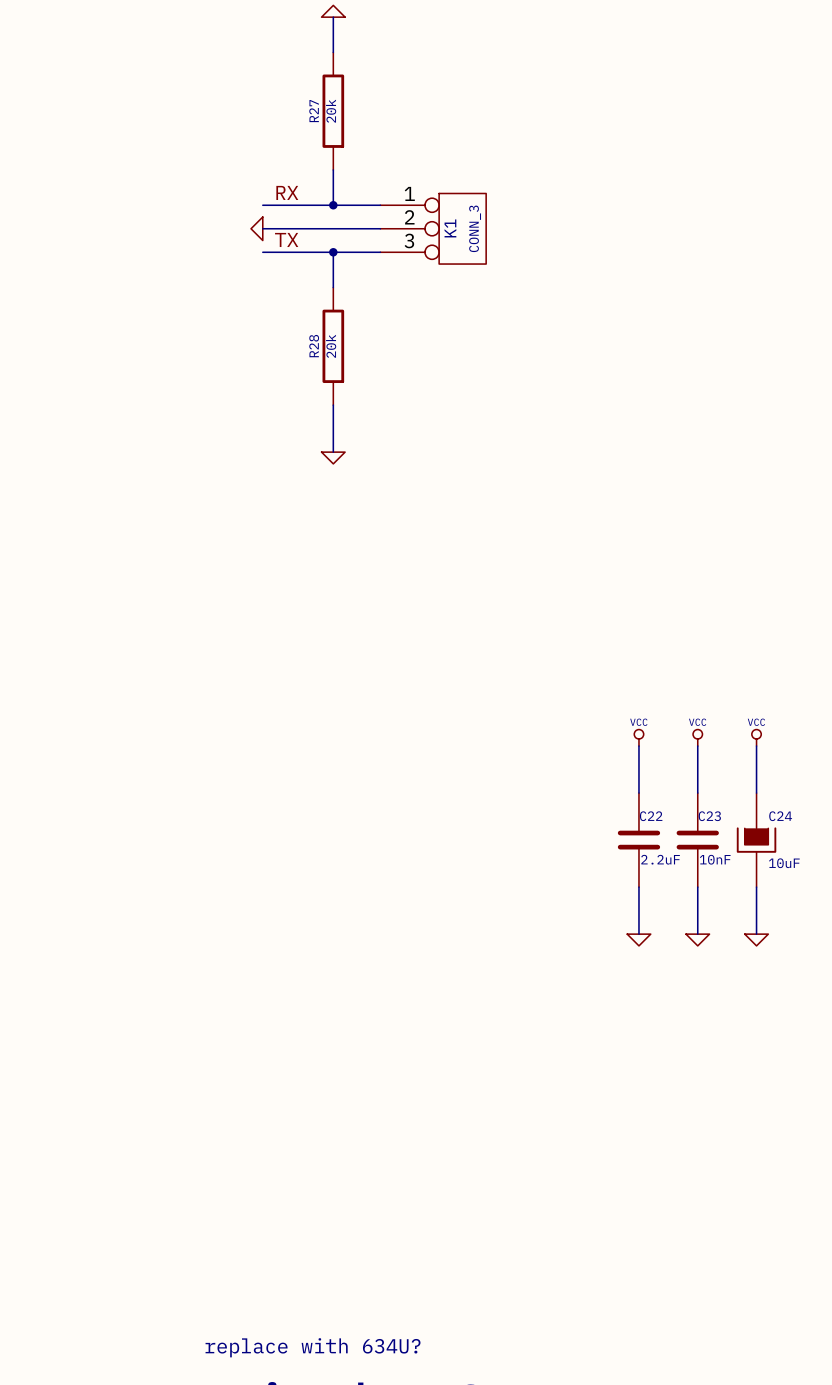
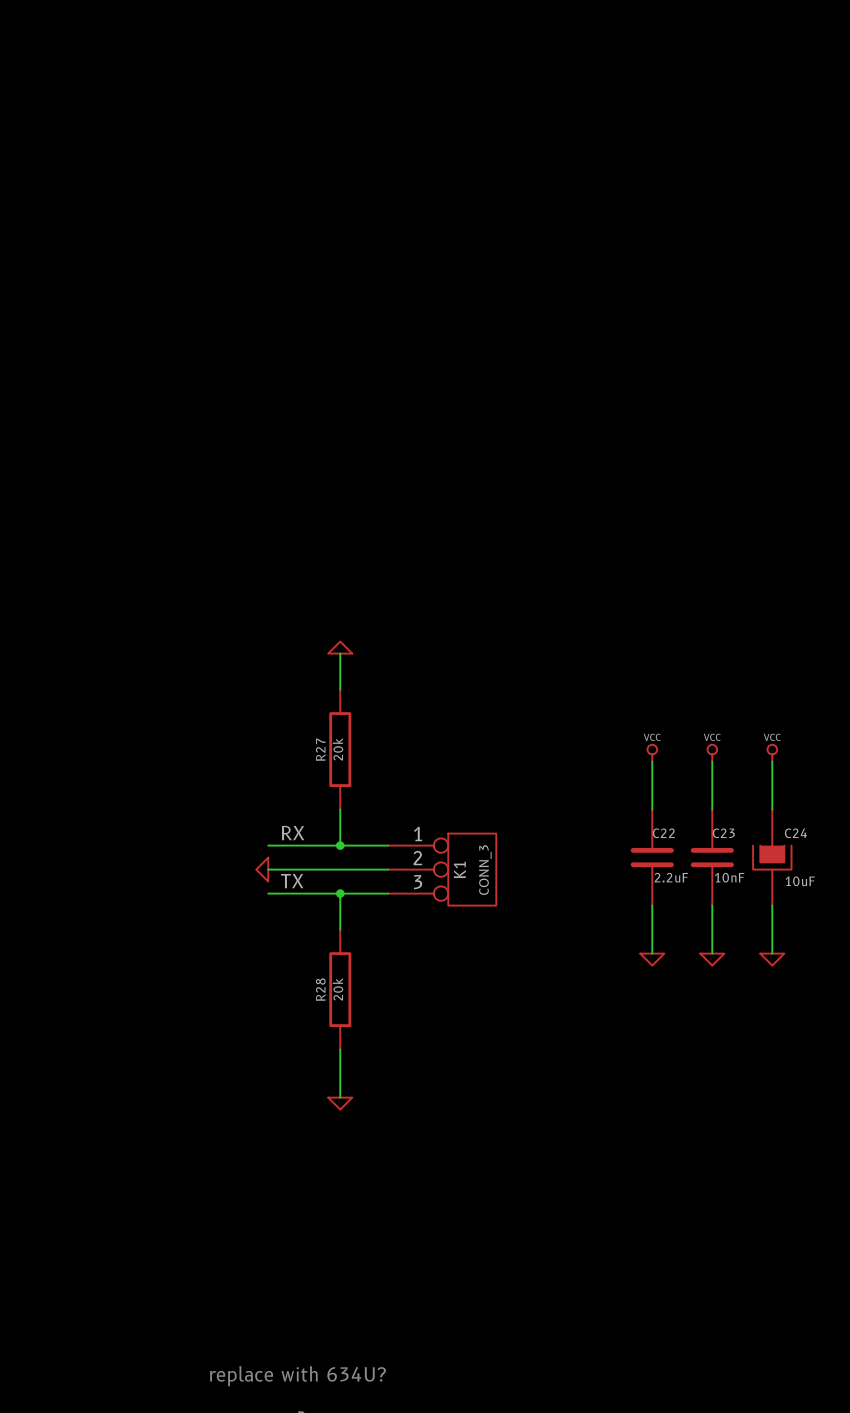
power symbol: (333, 11) -> none
wire: (333, 17) (333, 52) -> none
R27 position: (333, 111) -> (340, 749)
wire: (333, 169) (333, 205) -> none
label: RX (287, 192) -> none
wire: (262, 205) (380, 205) -> none
junction: (333, 205) -> none
power symbol: (256, 228) -> none
wire: (262, 228) (380, 228) -> none
K1 position: (433, 228) -> (442, 869)
label: TX (286, 239) -> none
wire: (262, 252) (380, 252) -> none
wire: (333, 252) (333, 287) -> none
junction: (333, 252) -> none
R28 position: (333, 346) -> (340, 989)
wire: (333, 405) (333, 452) -> none
power symbol rotation: 0° (333, 458) -> 180° (340, 647)
power symbol position: (333, 458) -> (340, 647)
wire: none -> (340, 653) (340, 689)
wire: none -> (340, 809) (340, 845)
label: none -> RX (293, 833)
wire: none -> (268, 845) (388, 845)
junction: none -> (340, 845)
power symbol: none -> (262, 869)
wire: none -> (268, 869) (388, 869)
label: none -> TX (292, 881)
wire: none -> (268, 893) (388, 893)
wire: none -> (340, 893) (340, 929)
junction: none -> (340, 893)
wire: none -> (340, 1049) (340, 1097)
power symbol: none -> (340, 1103)

